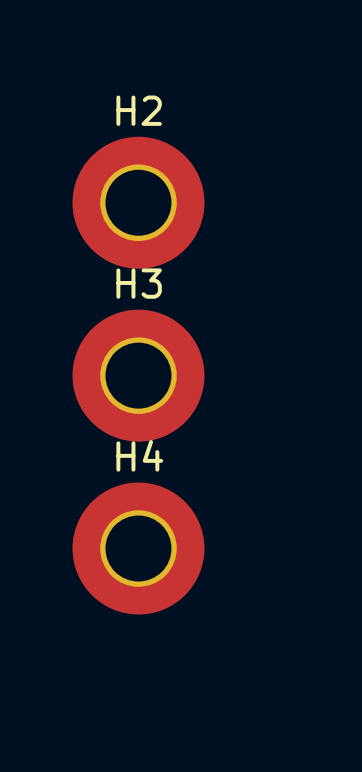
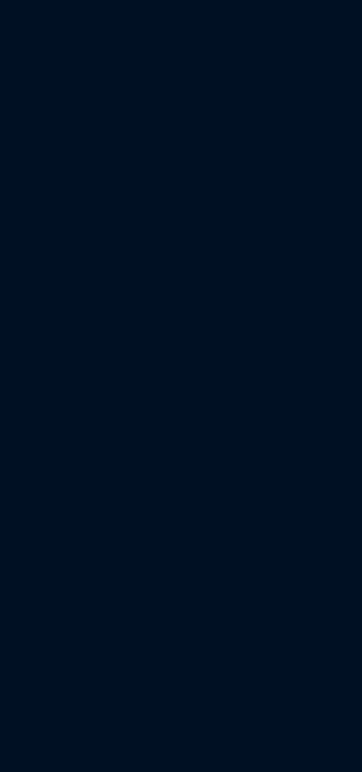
H2: (138, 202) -> none
H3: (138, 375) -> none
H4: (138, 548) -> none

